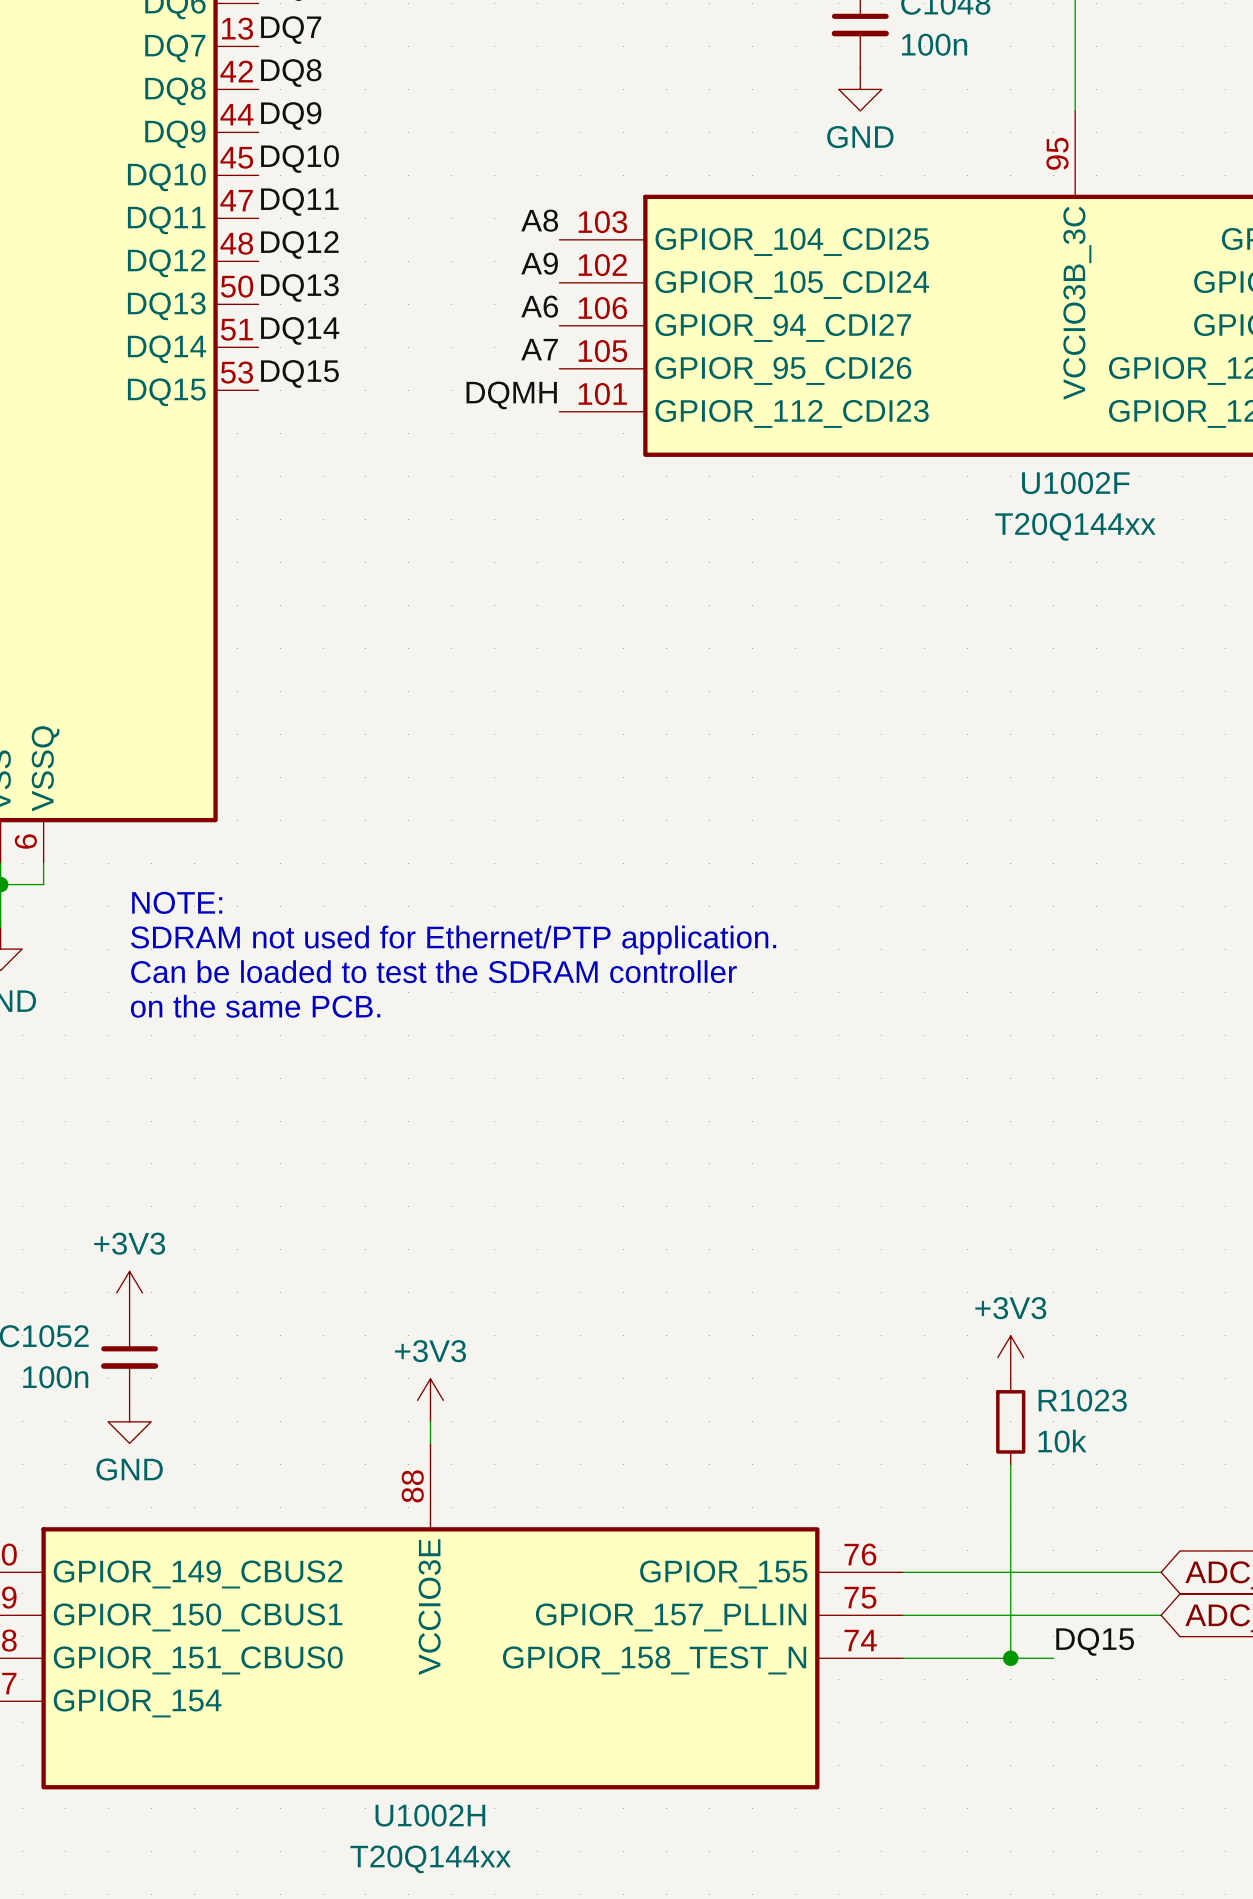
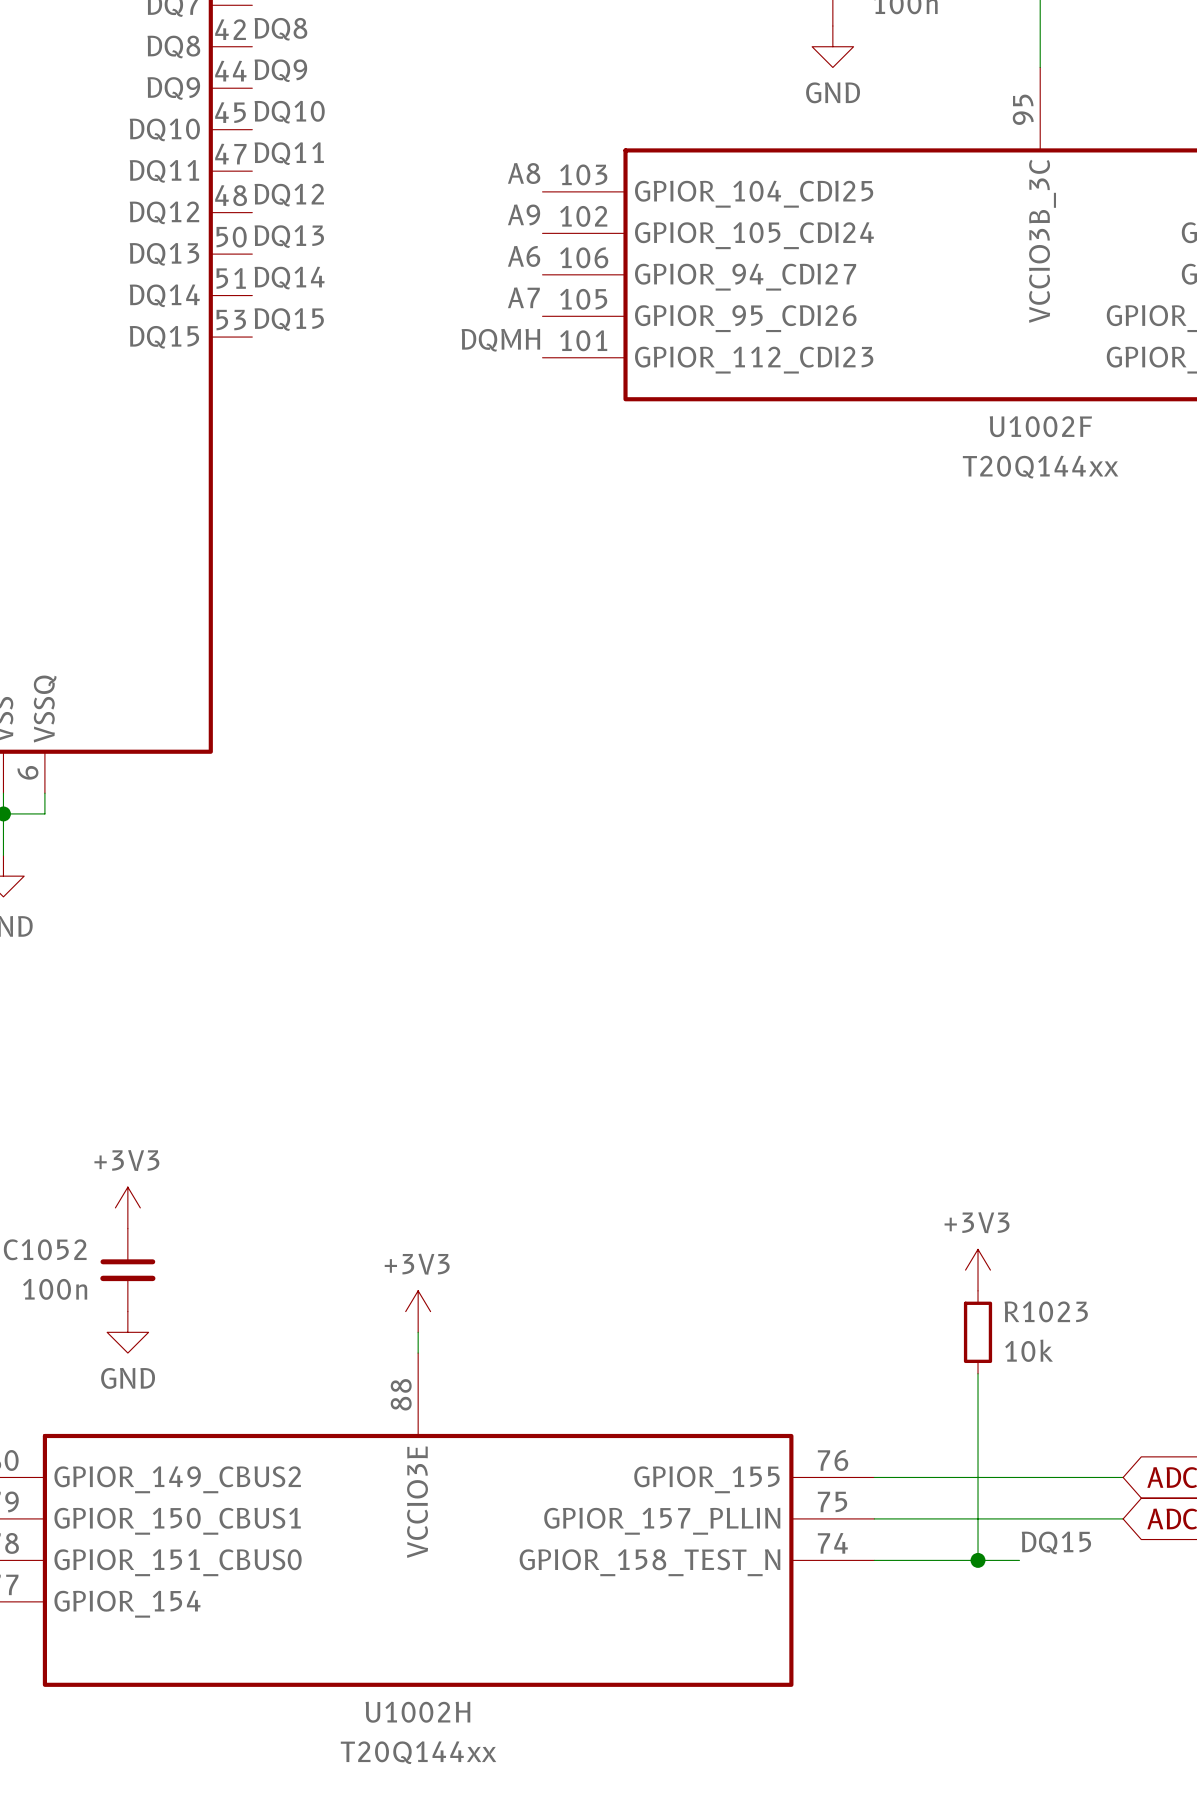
text: NOTE: (177, 902) -> none
text: SDRAM not used for Ethernet/PTP application. (453, 940) -> none
text: Can be loaded to test the SDRAM controller (433, 971) -> none
text: on the same PCB. (255, 1006) -> none

